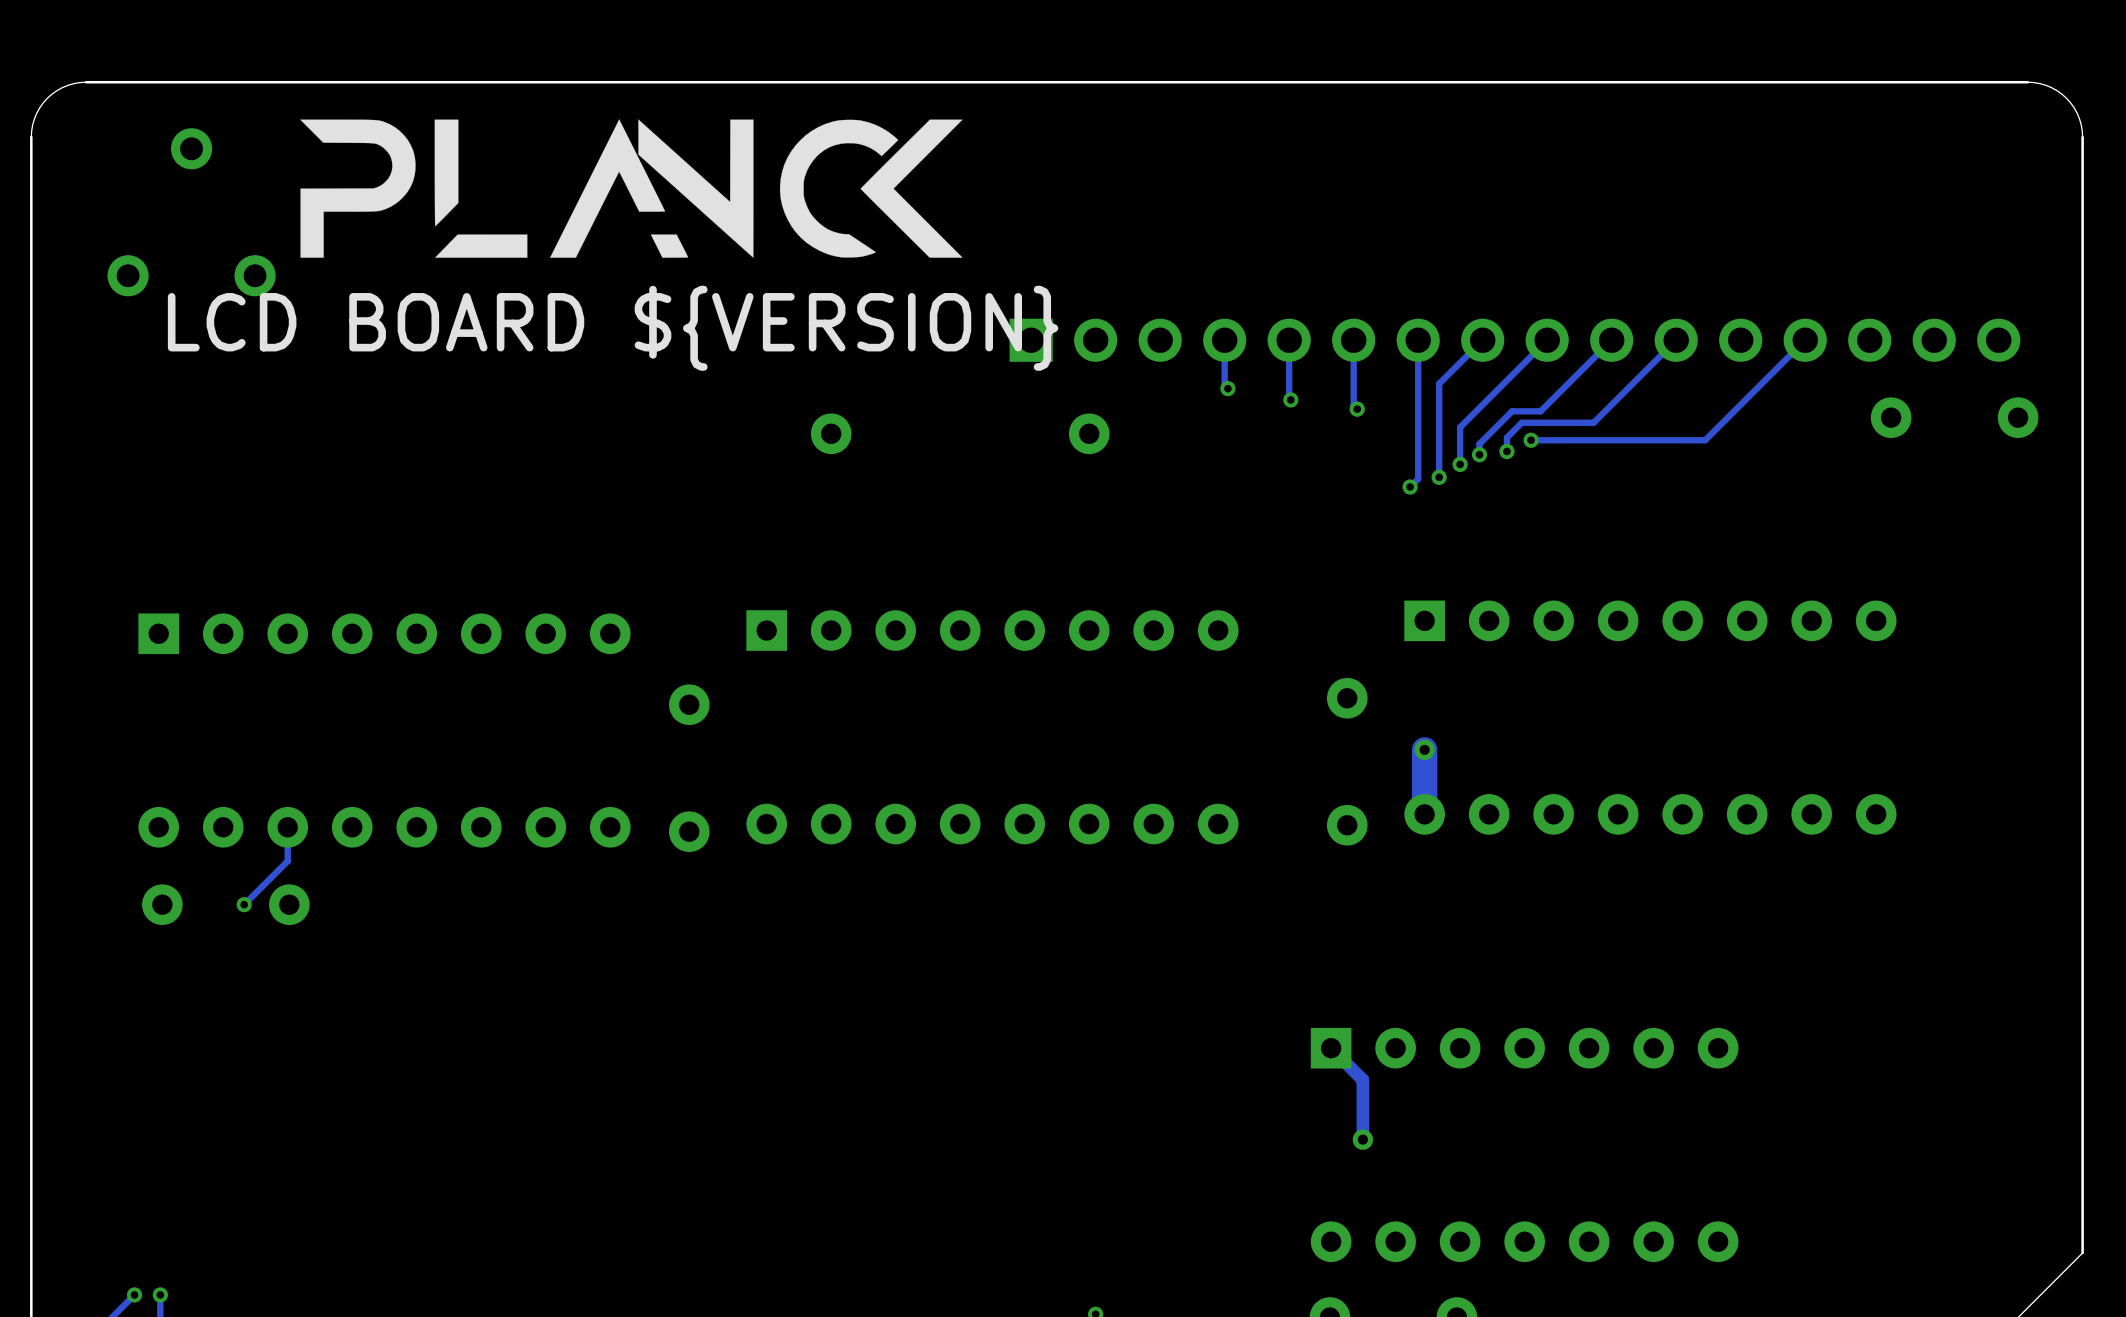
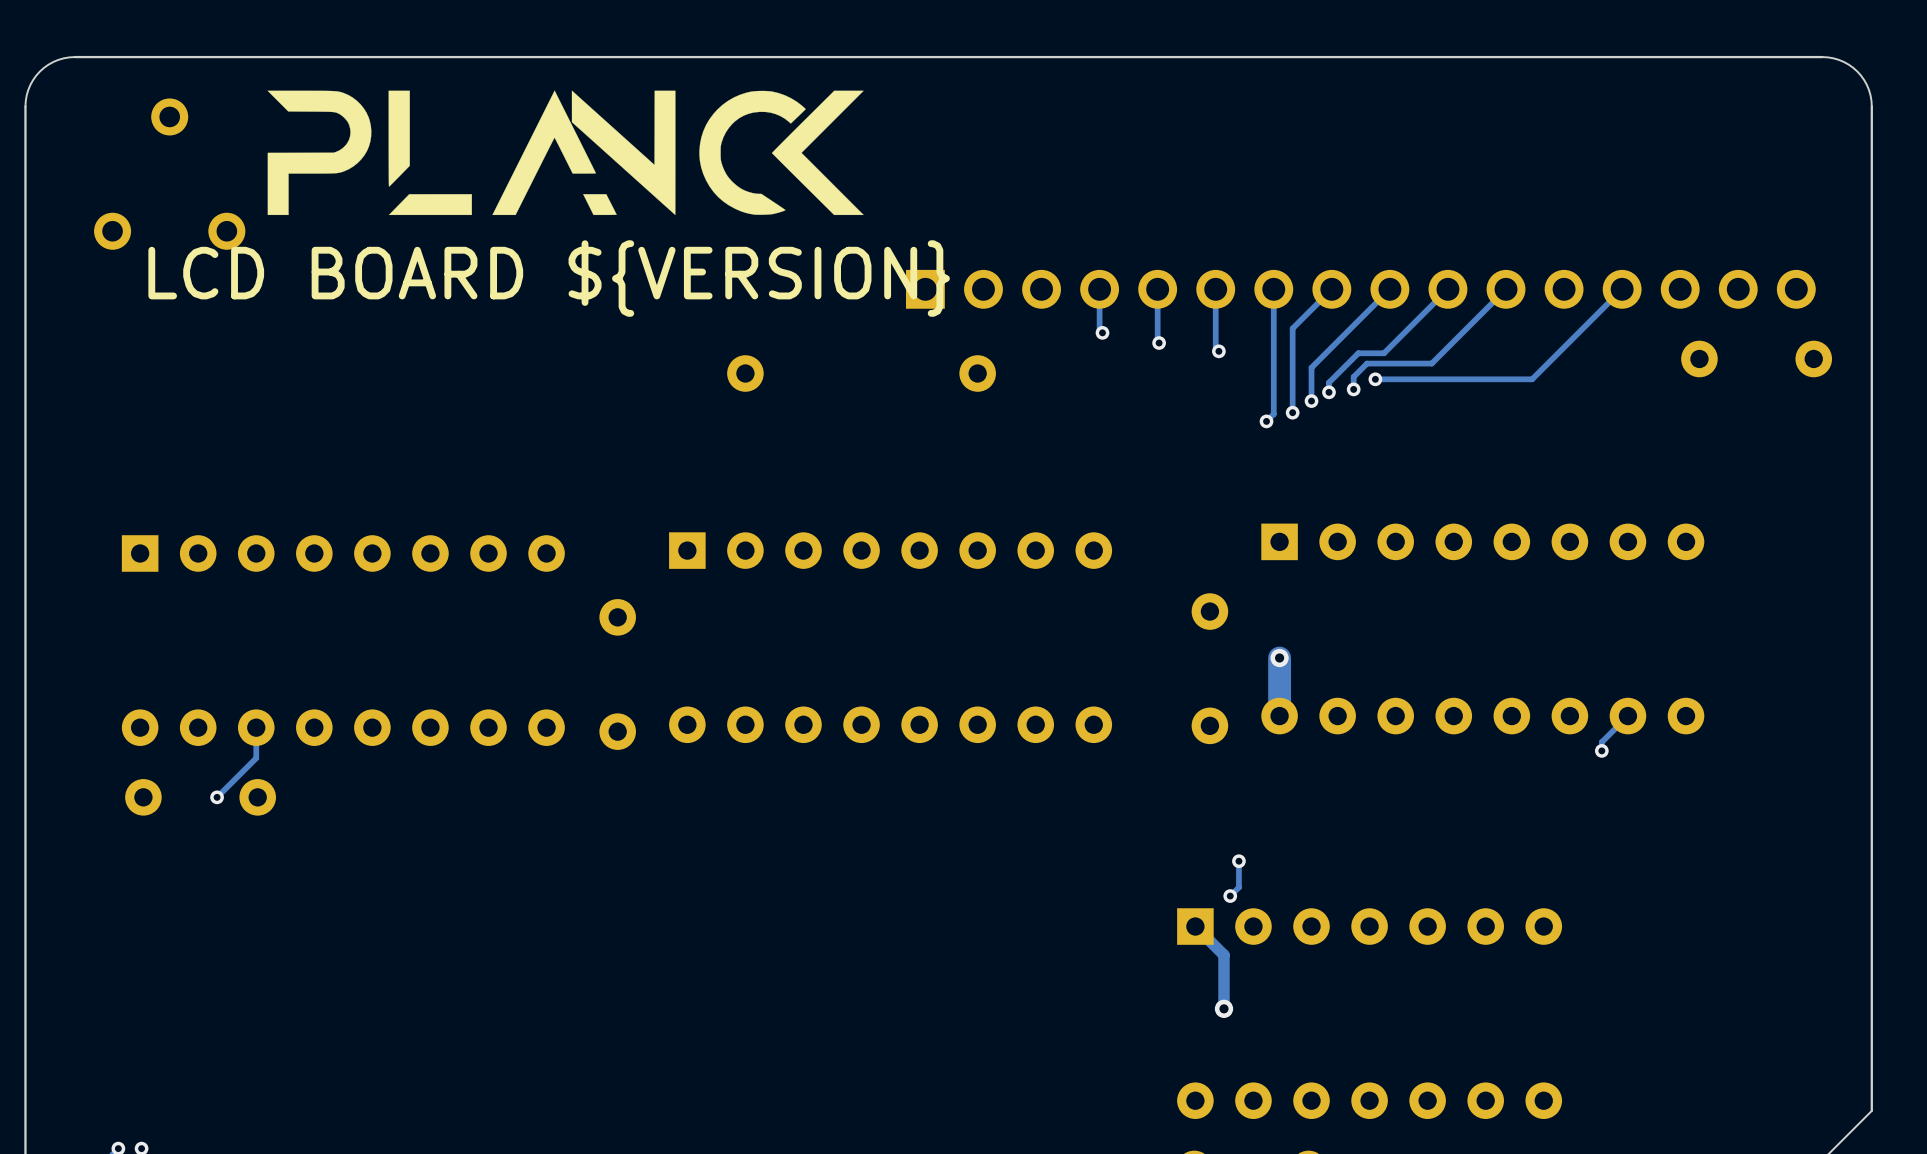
track: none -> (1627, 716) (1601, 742) (1601, 750)
via: none -> (1601, 750)
track: none -> (1238, 861) (1238, 887) (1230, 896)
via: none -> (1238, 861)
via: none -> (1230, 896)

